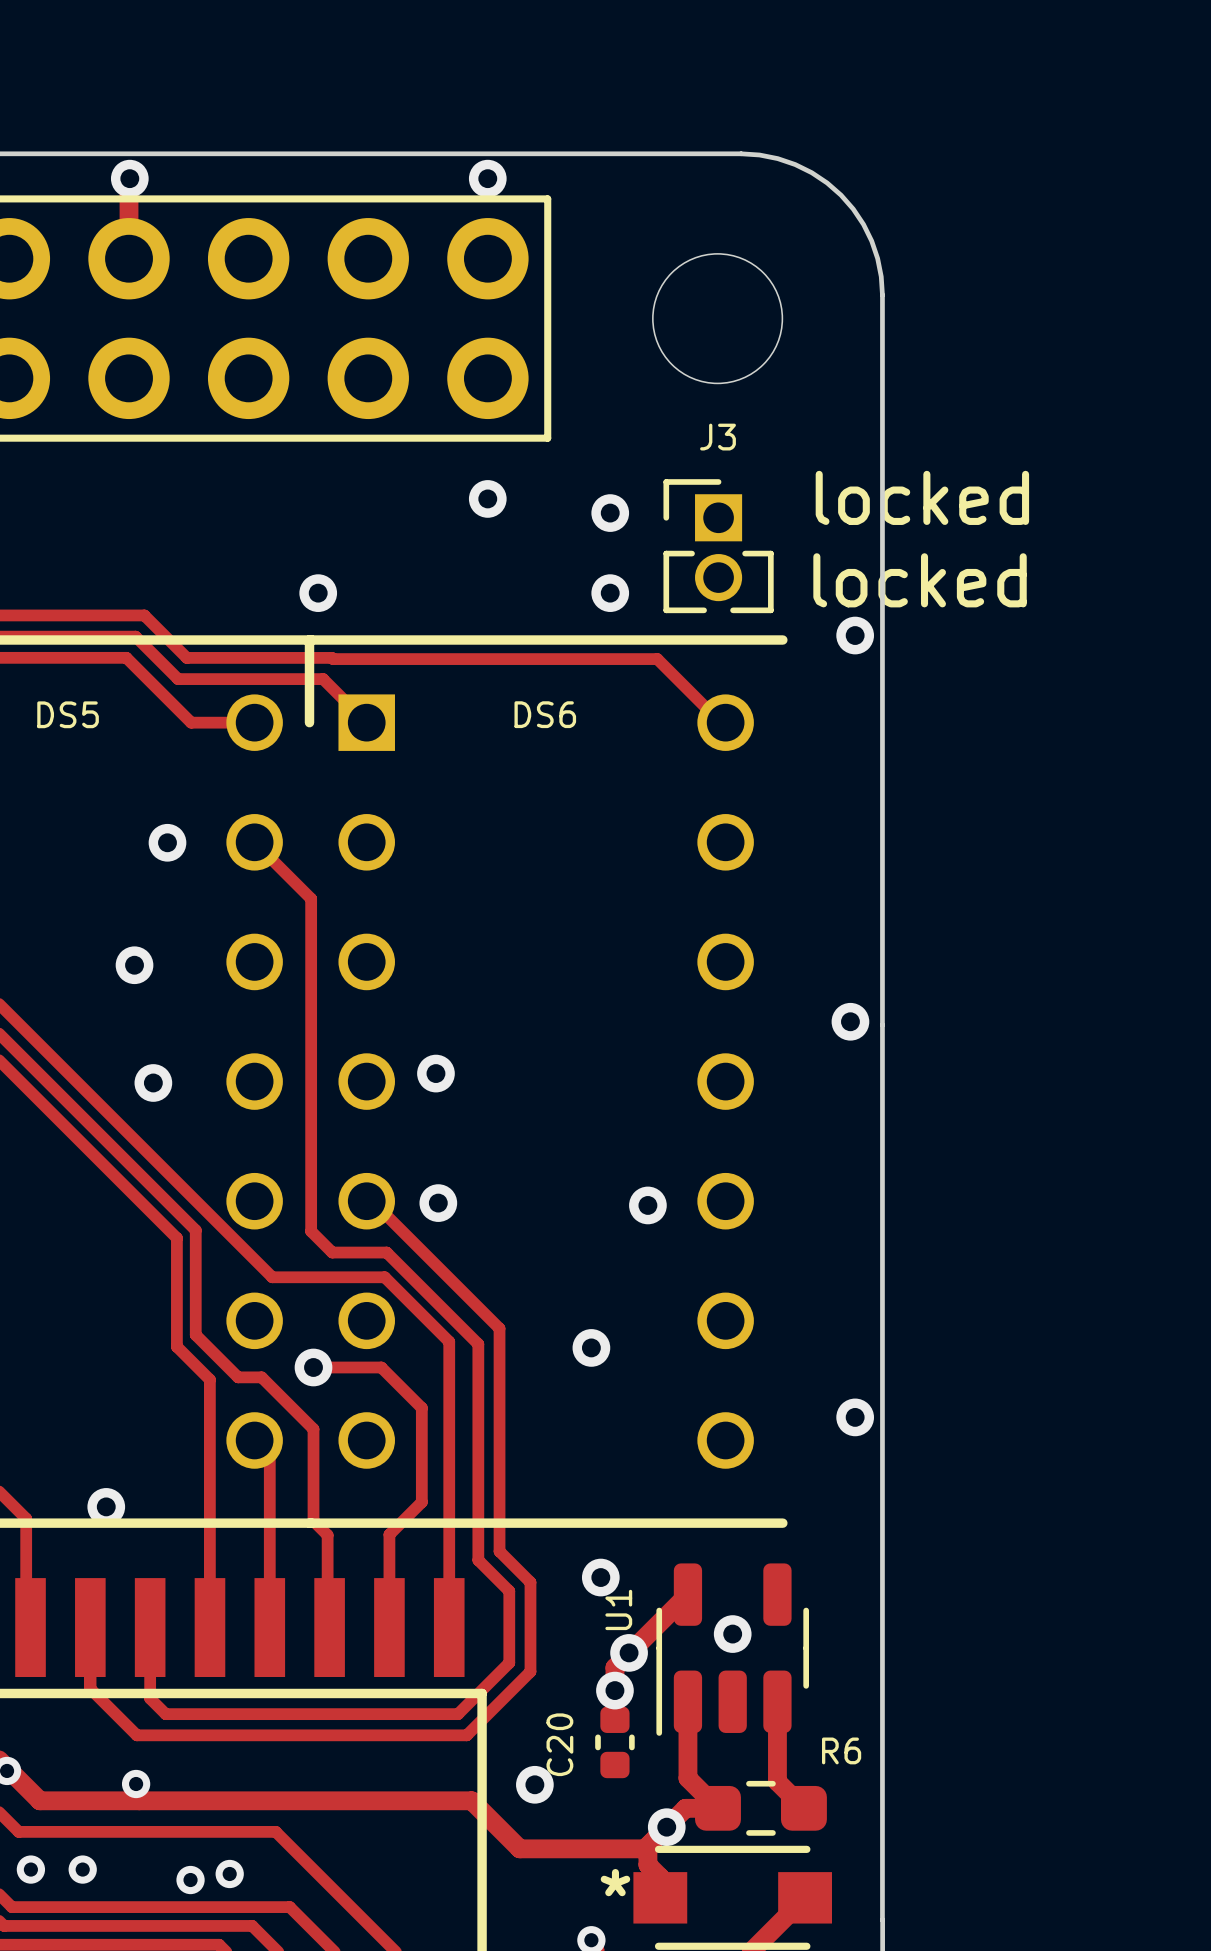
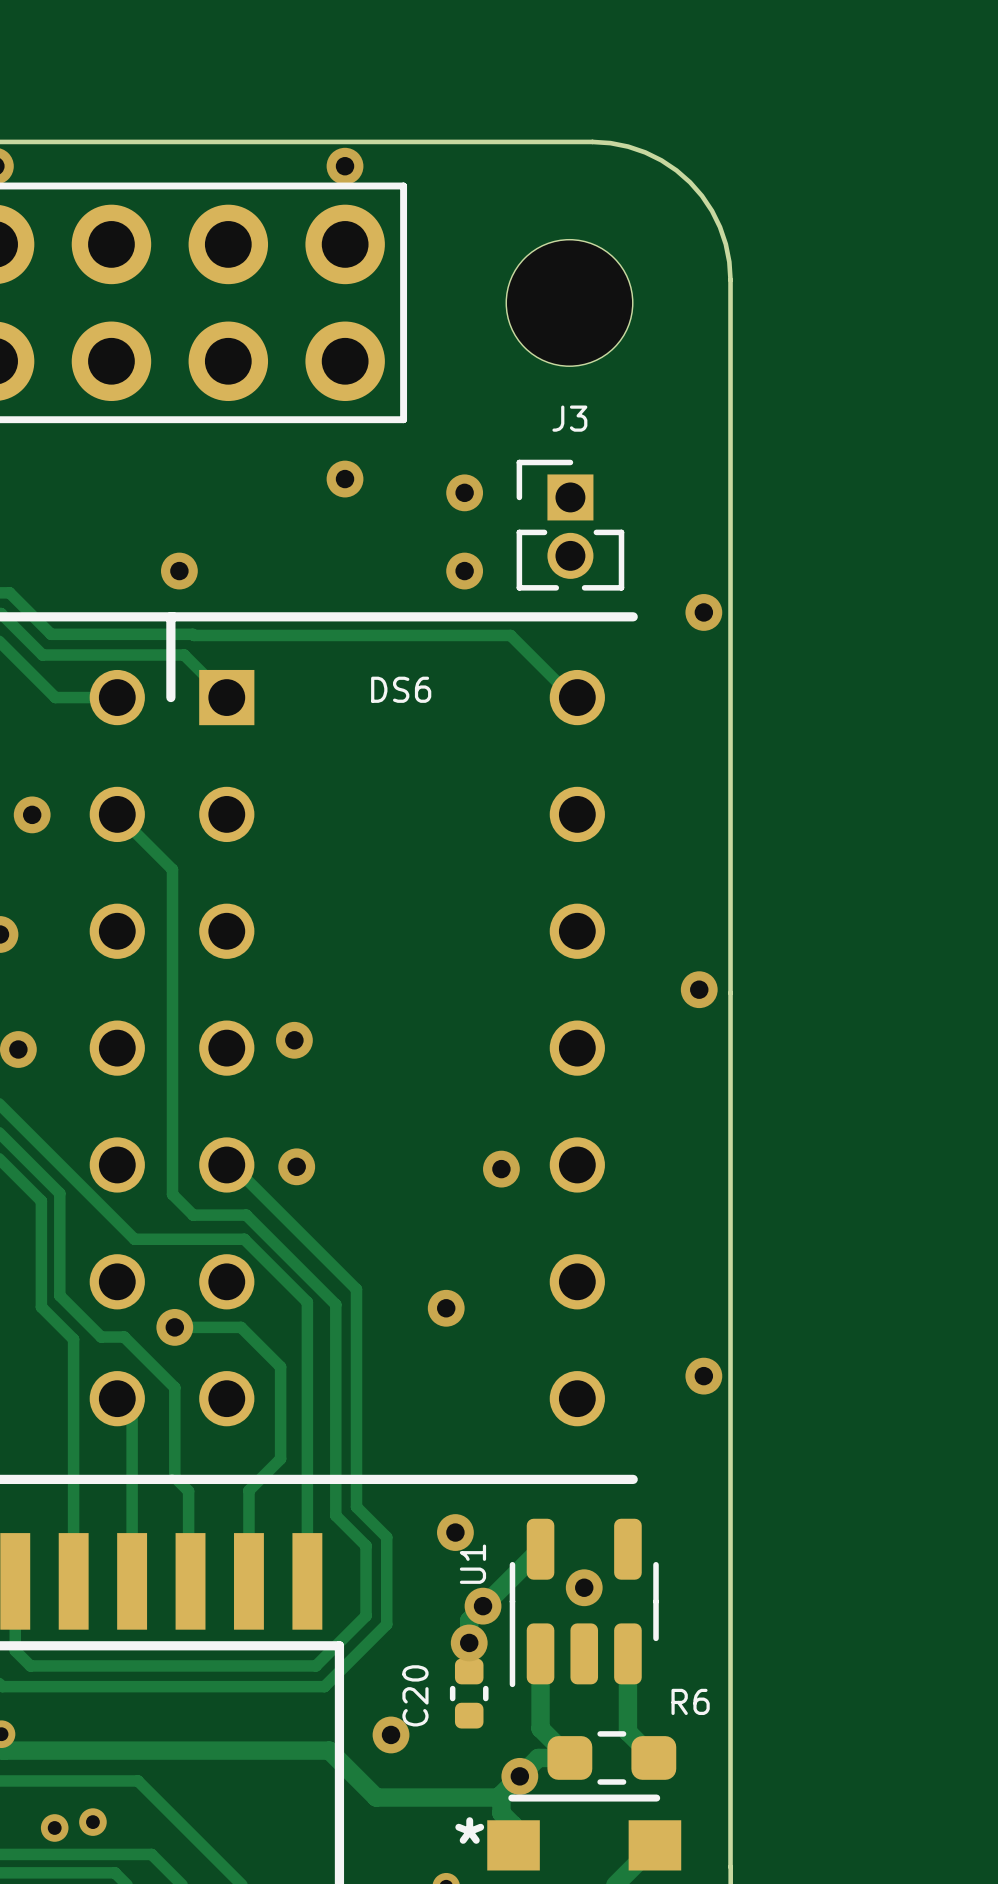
text: locked (922, 497) -> none
text: locked (920, 580) -> none

